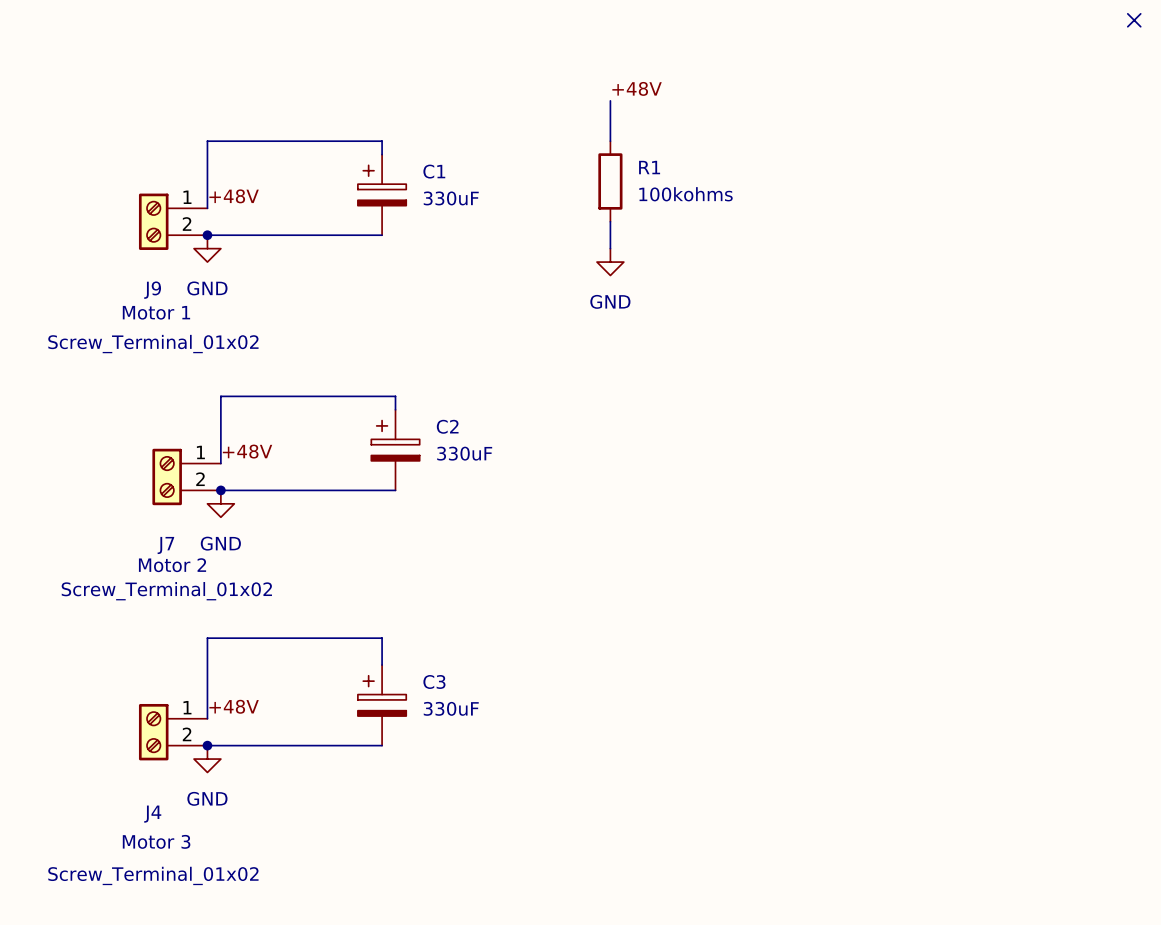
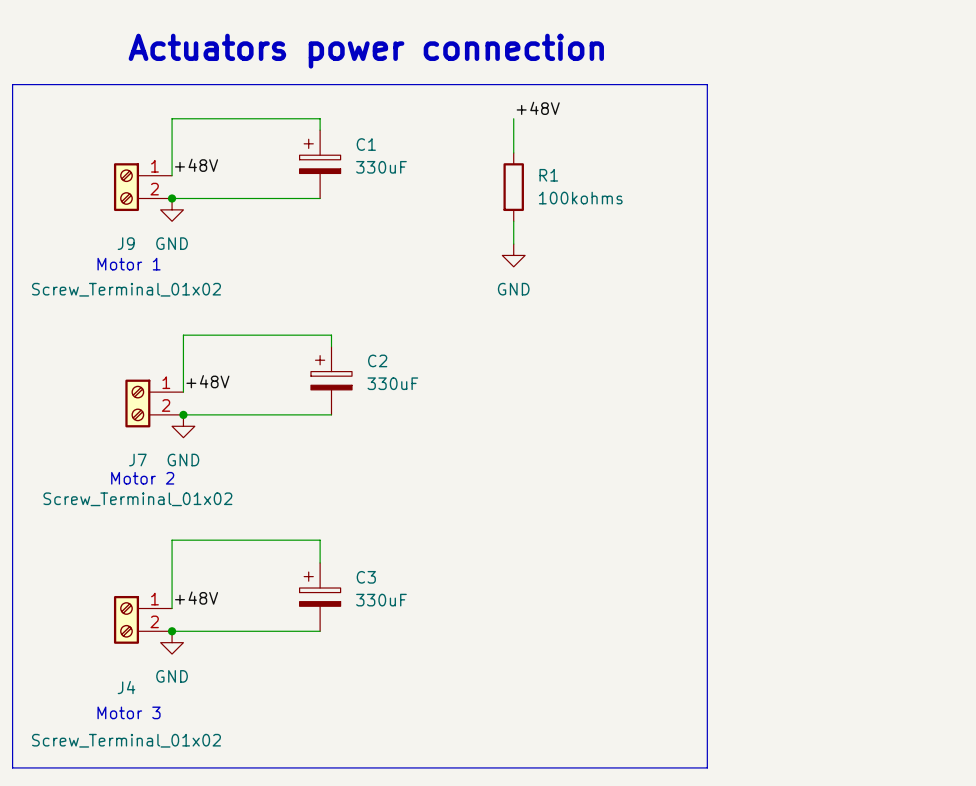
no-connect mark: (1134, 20) -> none
text: none -> Actuators power connection (366, 51)
label position: +48V (637, 88) -> +48V (538, 108)
line: none -> (12, 84) (707, 84) (707, 767) (12, 767) (12, 84)
wire: (610, 100) (610, 141) -> (513, 152) (513, 118)
R1 position: (610, 181) -> (513, 187)
wire: (610, 221) (610, 248) -> (513, 221) (513, 244)
power symbol position: GND (610, 262) -> GND (513, 255)

